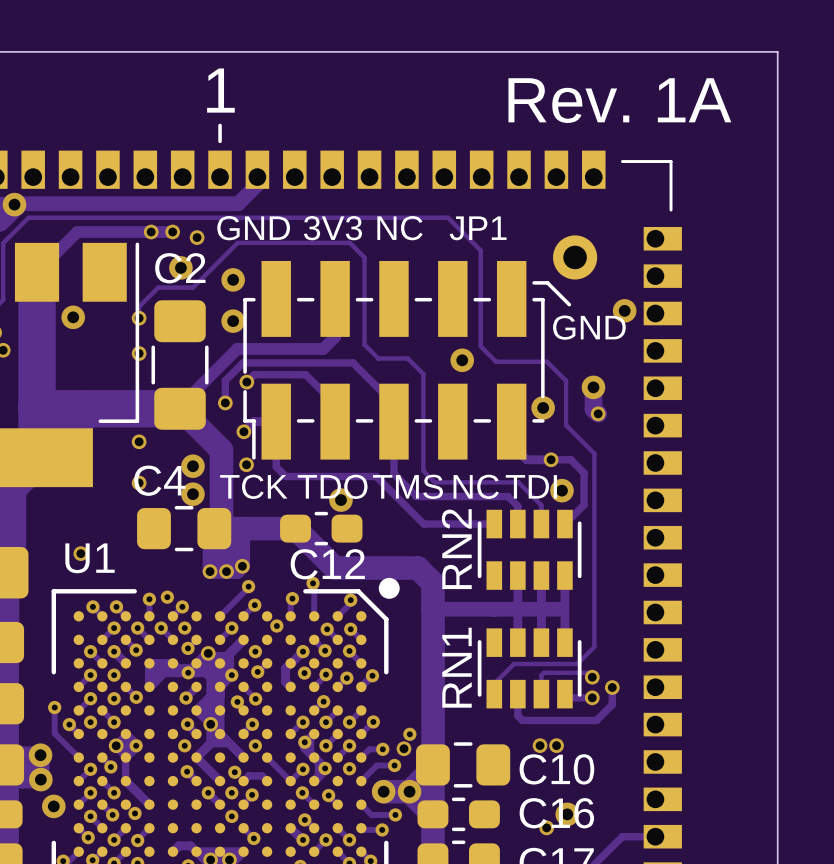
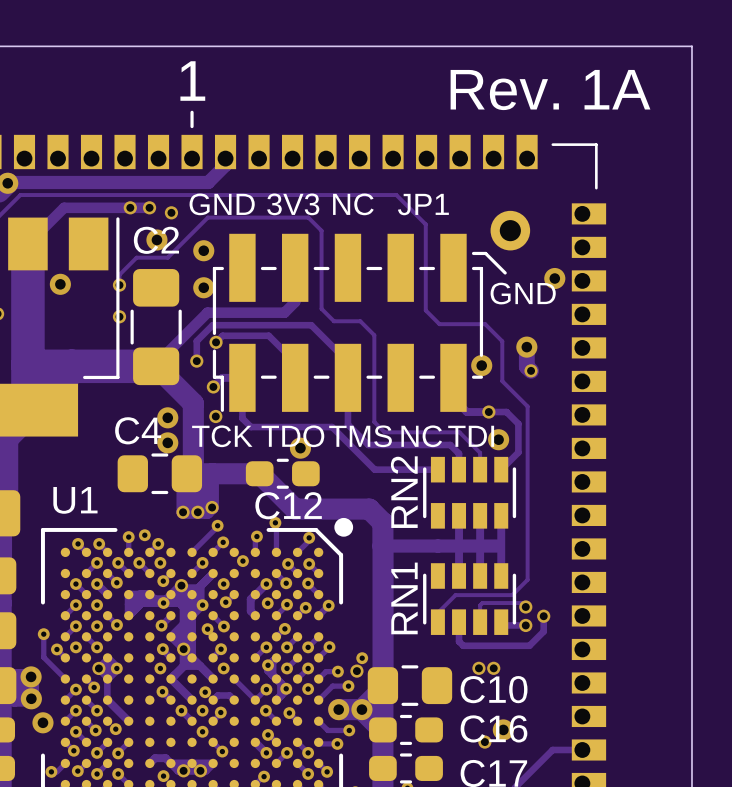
via: (462, 360) -> none
via: (139, 441) -> none
via: (139, 483) -> none
via: (80, 553) -> none

